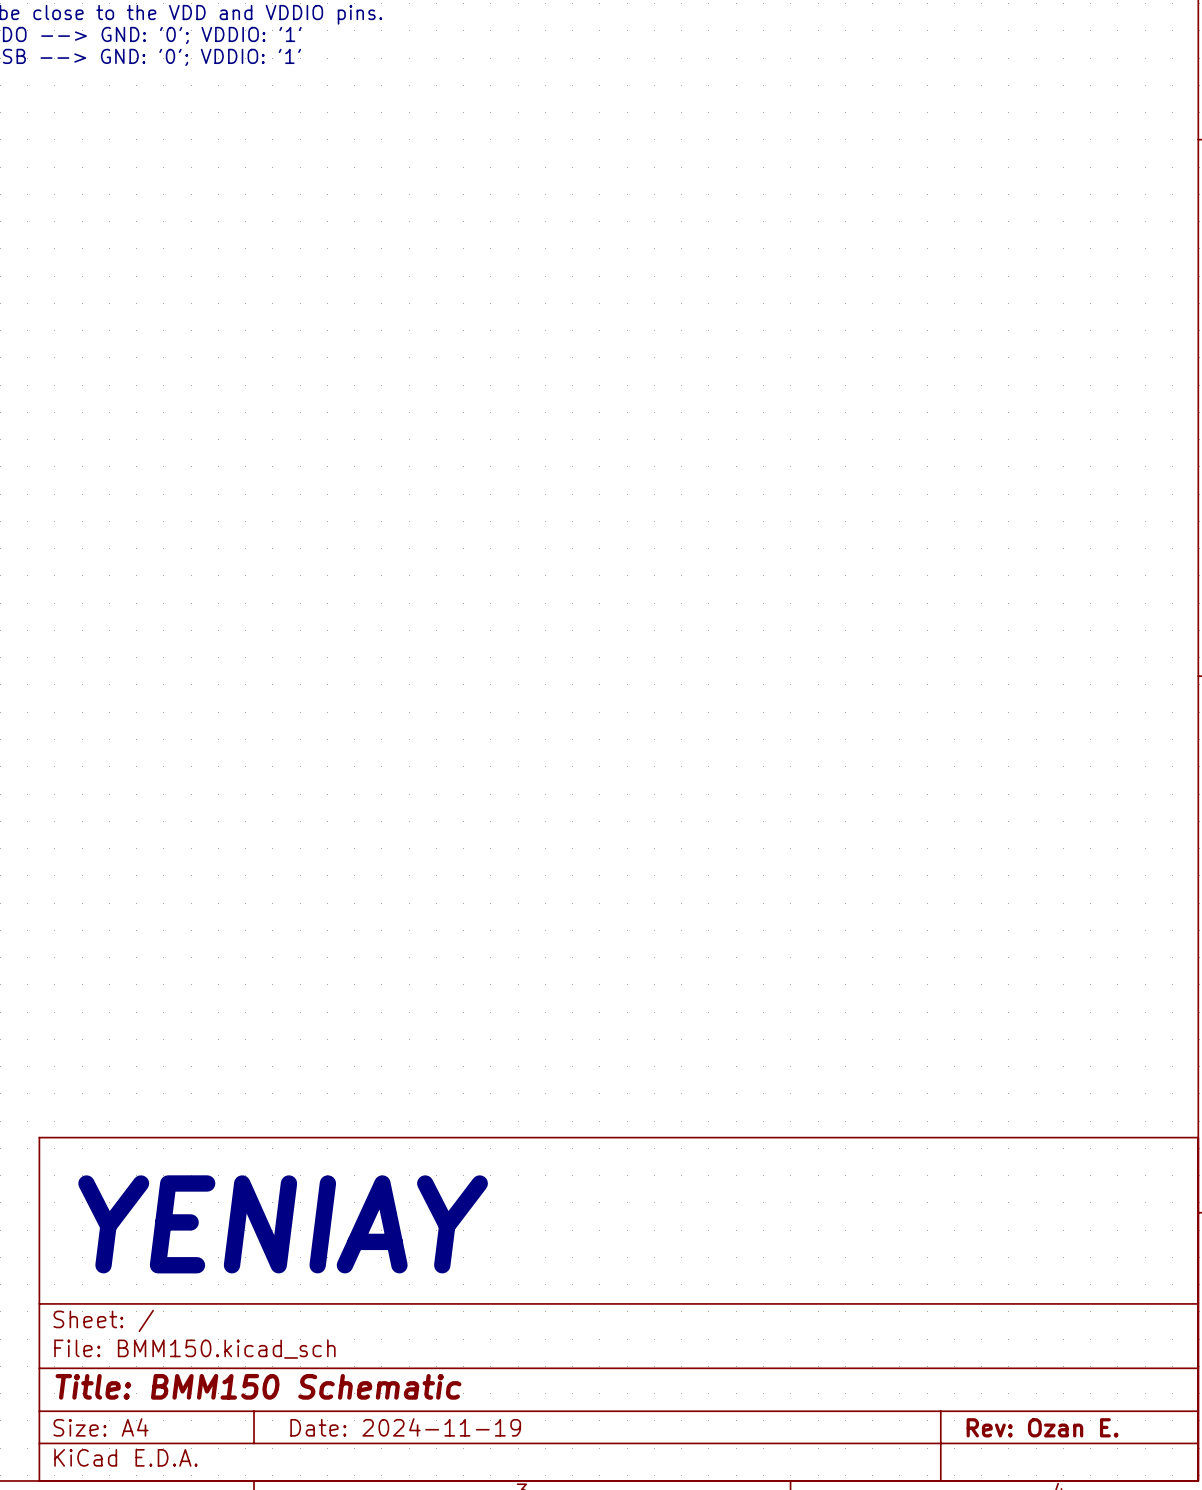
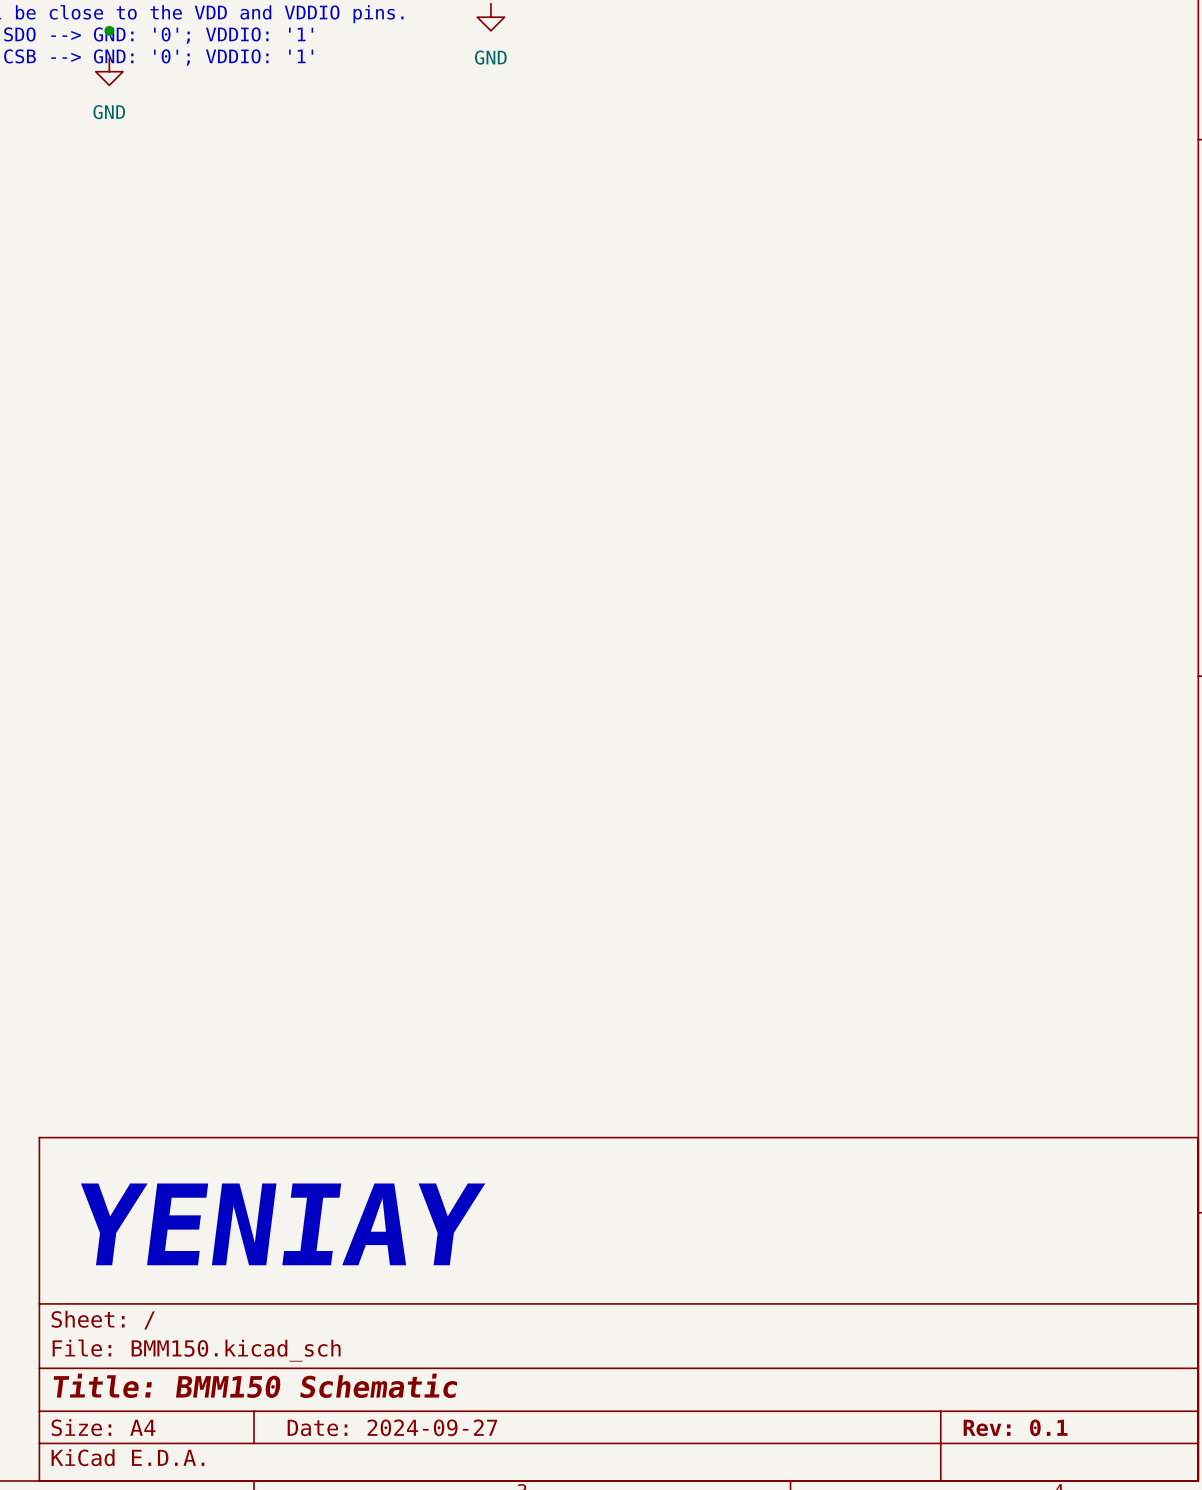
power symbol: none -> GND (490, 17)
junction: none -> (109, 30)
power symbol: none -> GND (109, 71)
title block: Date: 2024-11-19 (405, 1427) -> Date: 2024-09-27 (392, 1427)
title block: Rev: Ozan E. (1042, 1427) -> Rev: 0.1 (1015, 1427)

